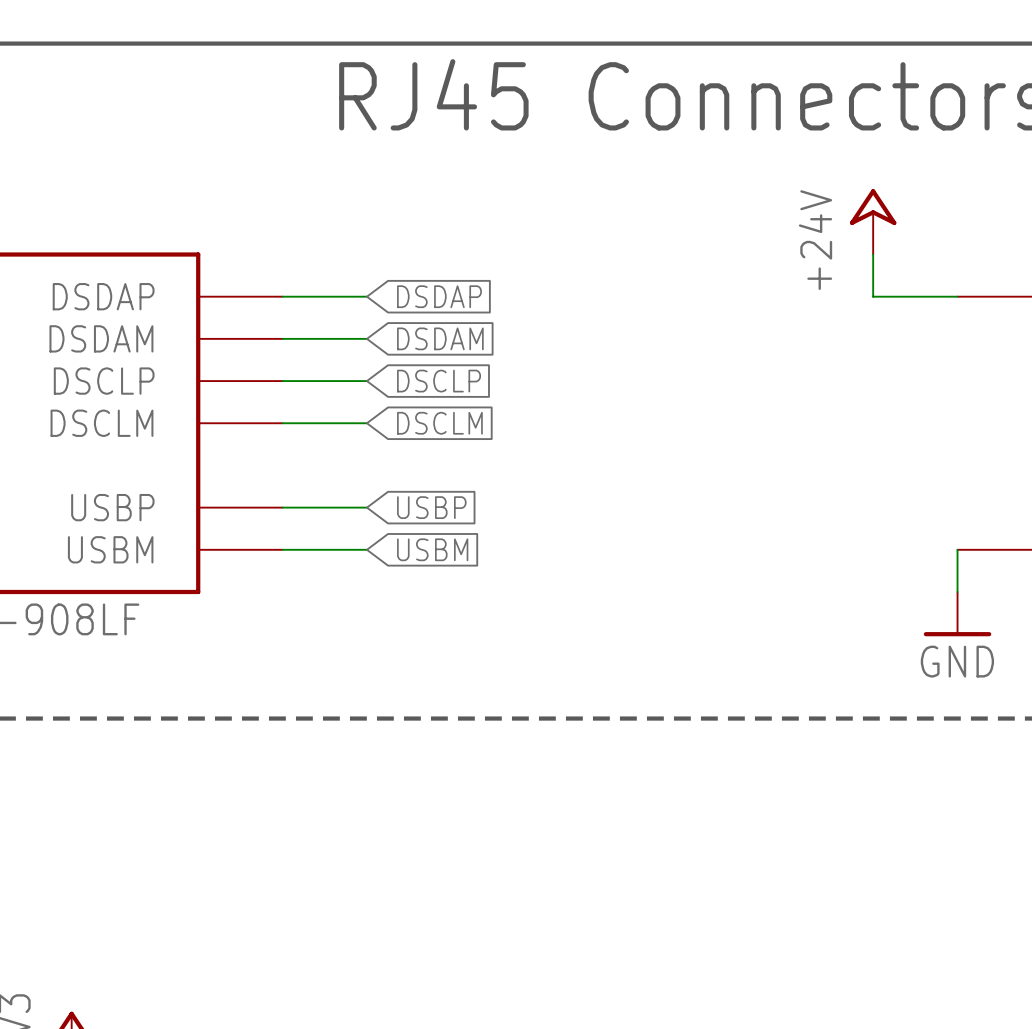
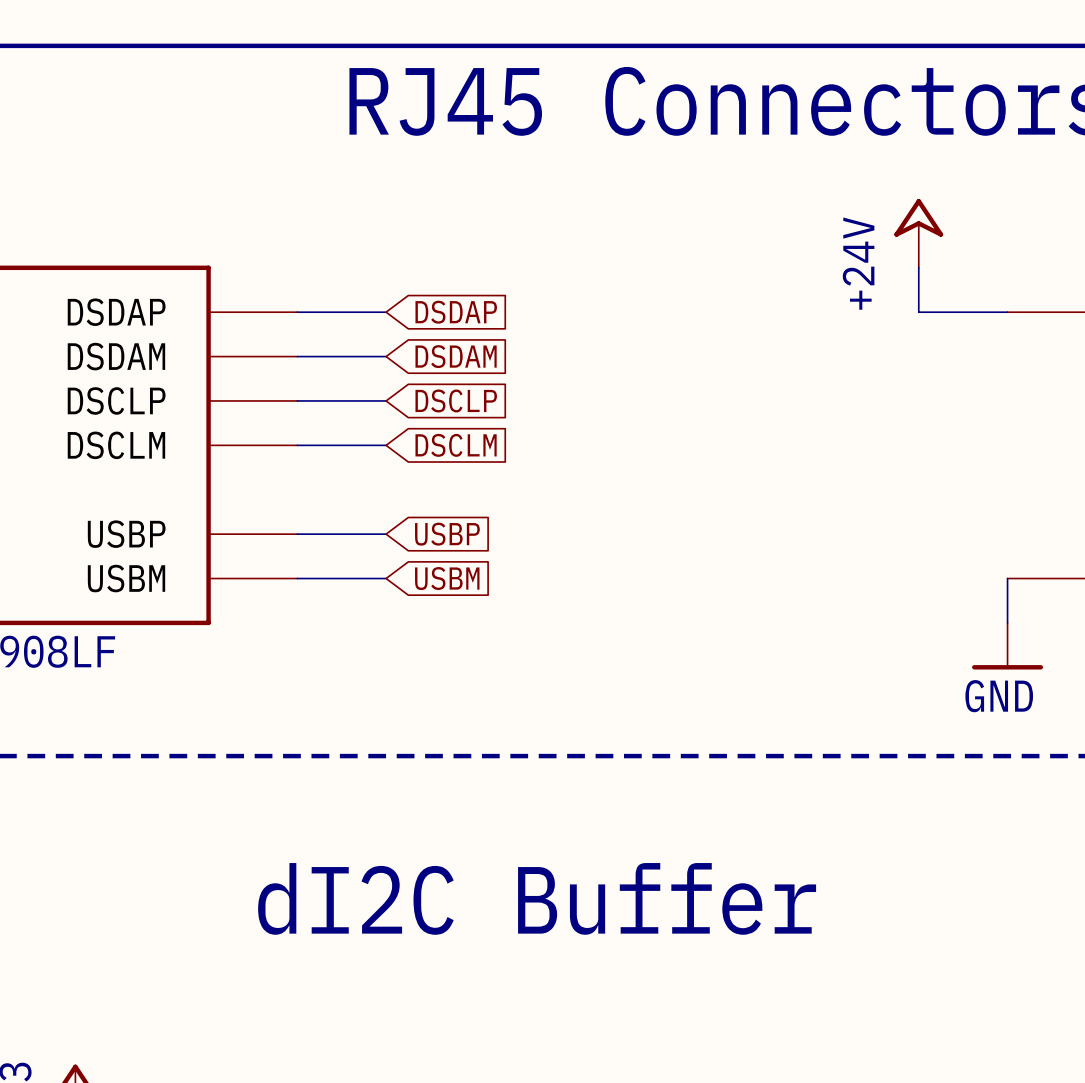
text: none -> dI2C Buffer (537, 898)

